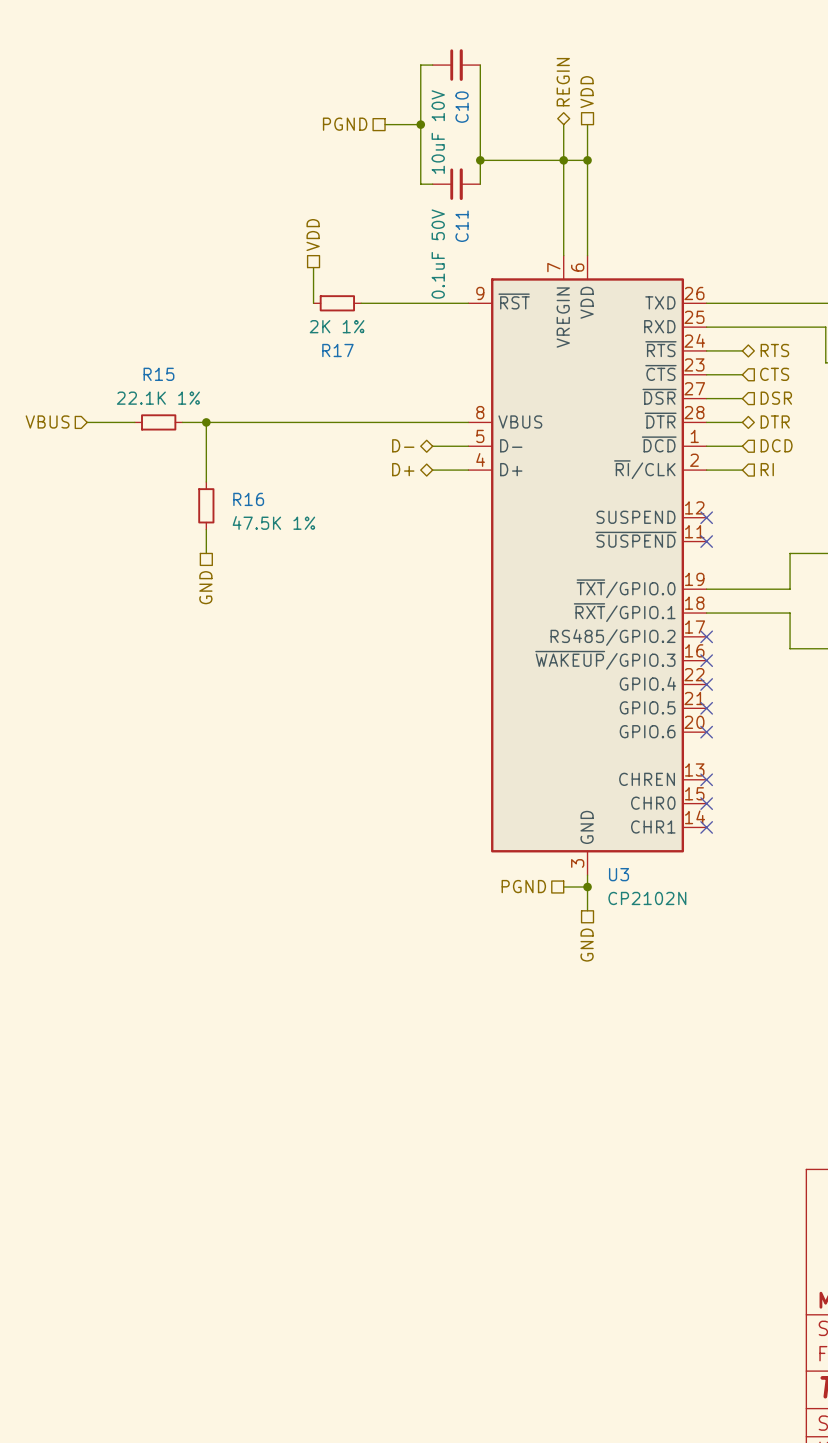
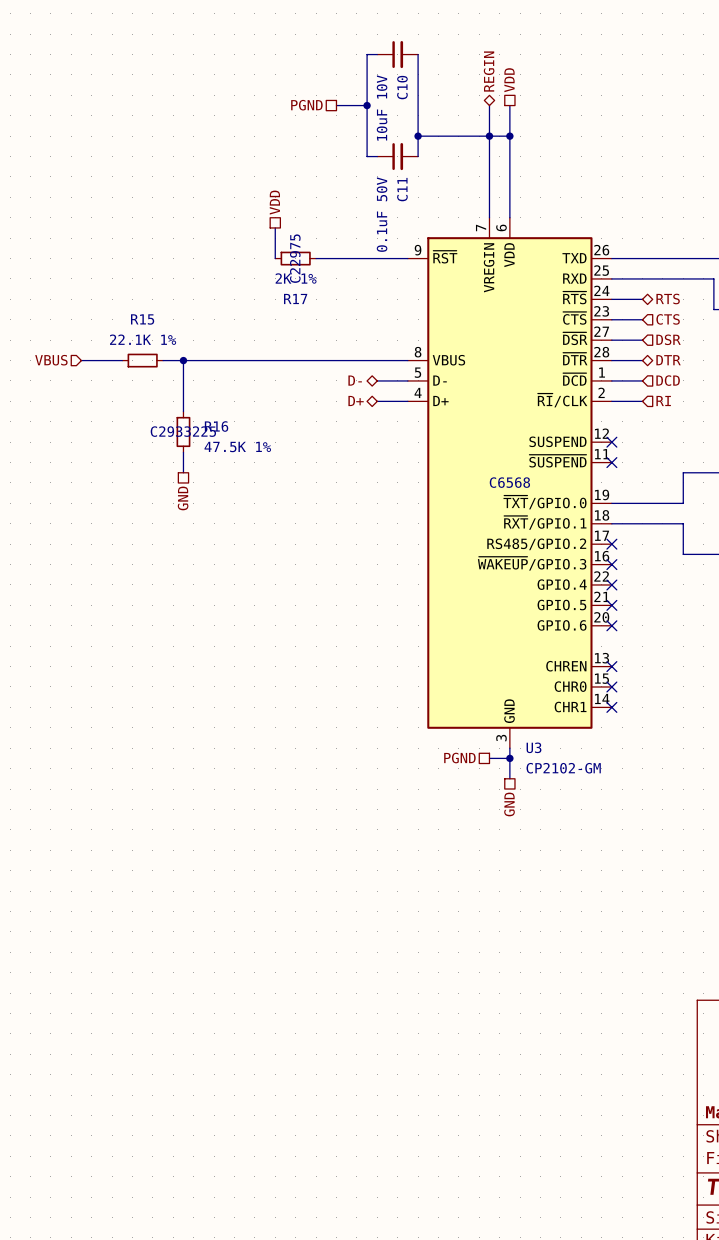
R17 text: none -> C22975 (295, 258)
R16 text: none -> C2933225 (183, 431)
U3 text: none -> C6568 (509, 482)
U3 value: CP2102N (647, 898) -> CP2102-GM (563, 768)

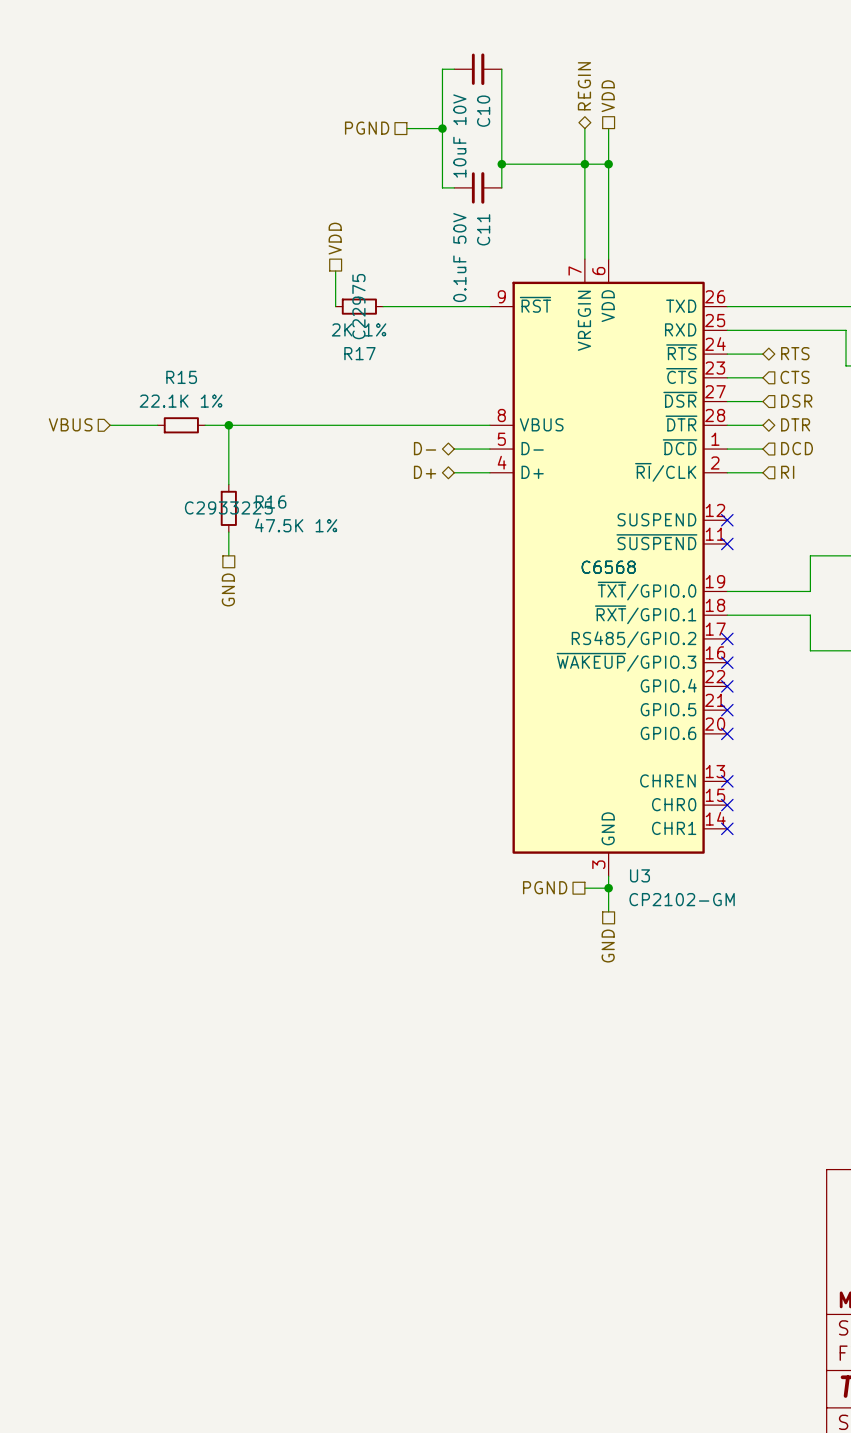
U3 text: none -> C6568 (608, 567)

